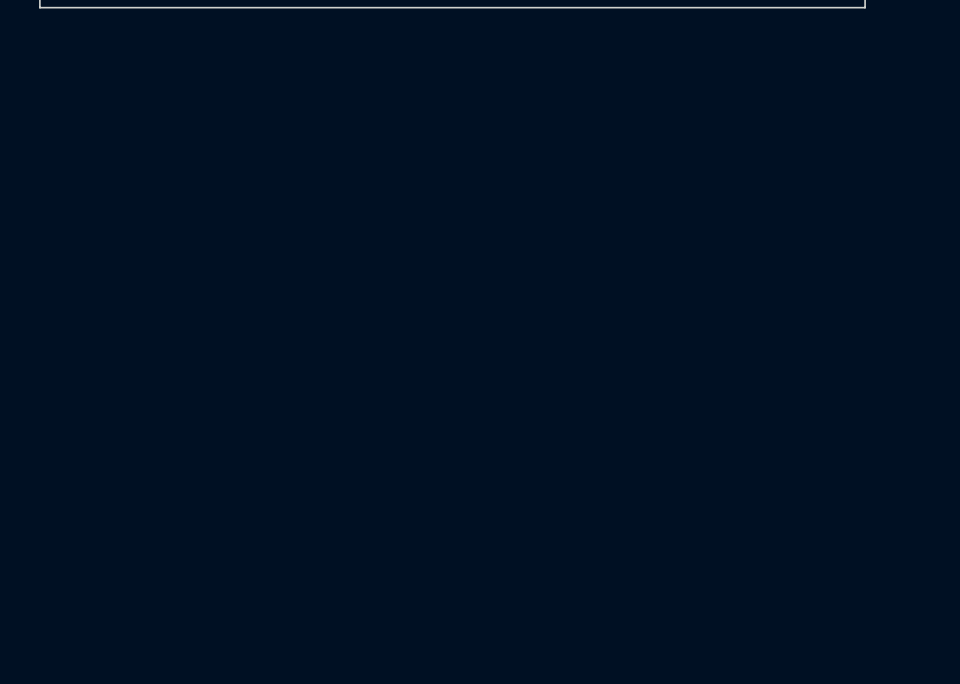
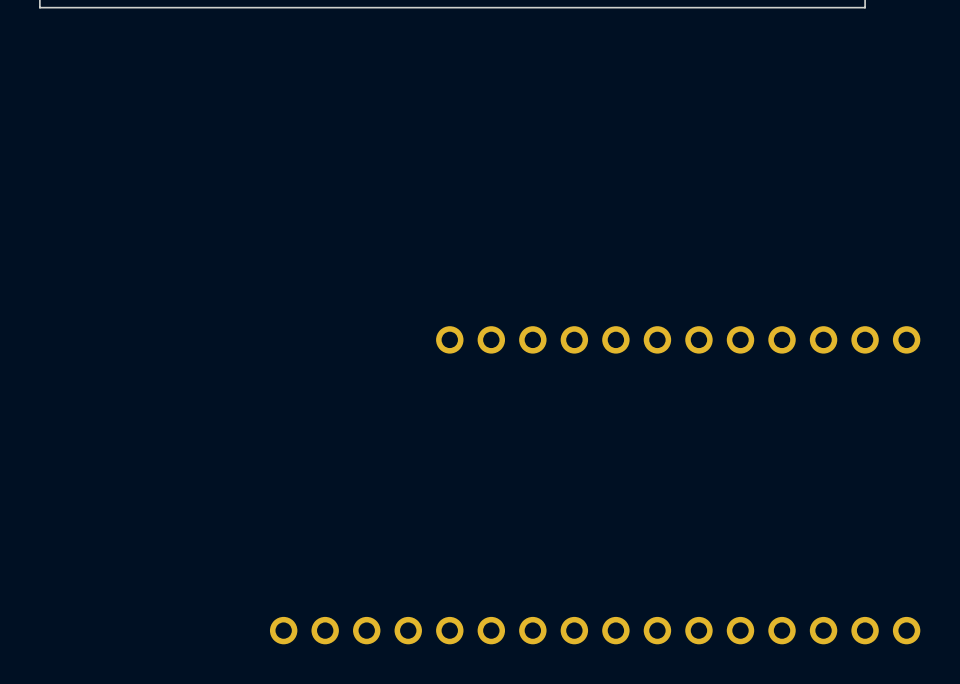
part: none -> (678, 339)
part: none -> (595, 630)

